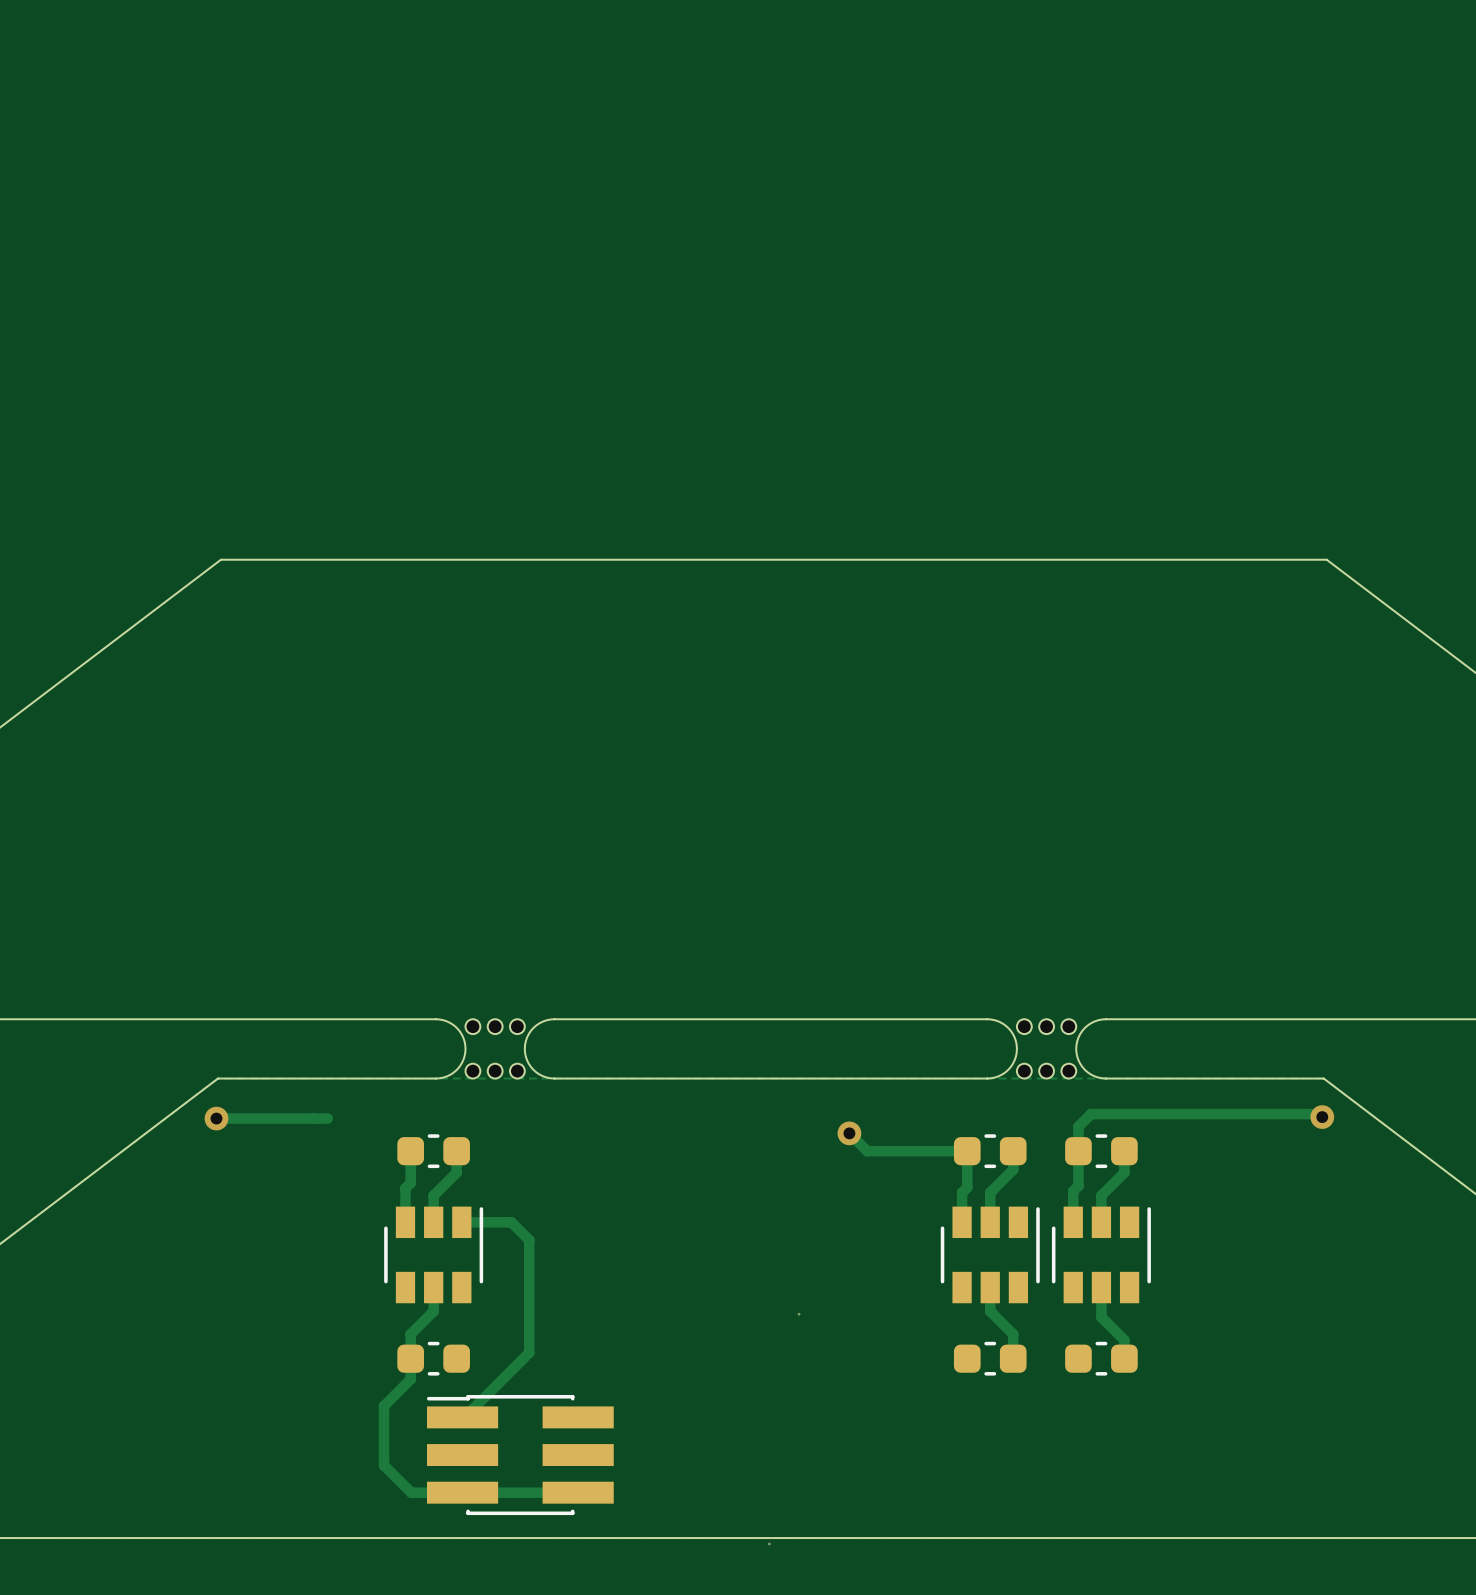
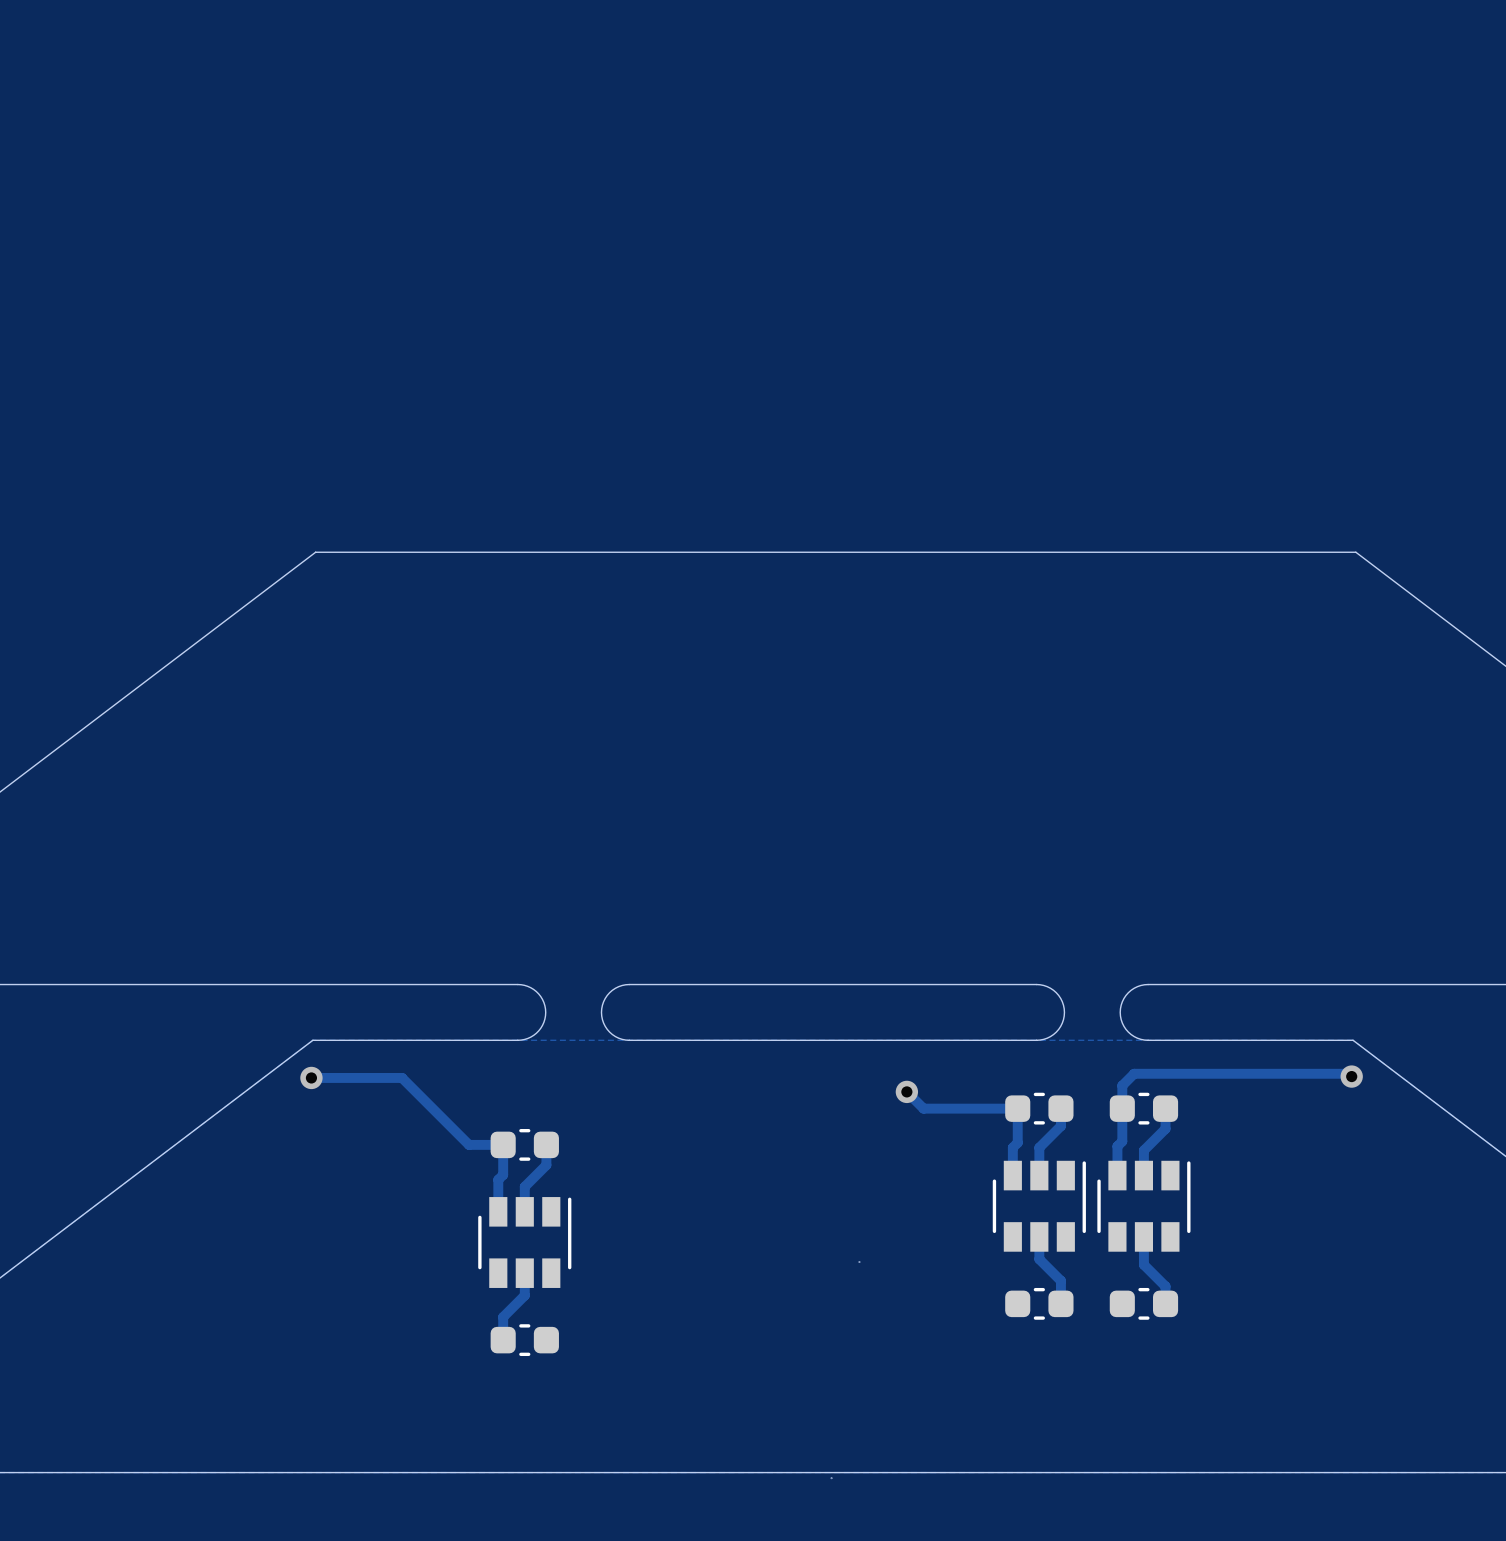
part: (495, 1048) -> none
part: (1046, 1048) -> none
track: (327, 1118) (312, 1118) -> (498, 1211) (498, 1179) (503, 1174) (503, 1144) (469, 1144) (402, 1077)
track: (410, 1151) (410, 1183) (405, 1188) (405, 1222) -> none
part position: (433, 1151) -> (524, 1144)
track: (456, 1151) (456, 1172) (433, 1195) (433, 1222) -> (546, 1144) (546, 1165) (524, 1186) (524, 1211)
track: (461, 1222) (511, 1222) (529, 1240) (529, 1352) (462, 1417) -> none
part position: (433, 1254) -> (524, 1242)
track: (433, 1287) (433, 1311) (410, 1334) (410, 1379) (383, 1406) (383, 1465) (411, 1492) (578, 1492) -> none
track: none -> (524, 1273) (524, 1295) (503, 1317) (503, 1340)
part position: (433, 1358) -> (524, 1340)
part: (520, 1455) -> none

